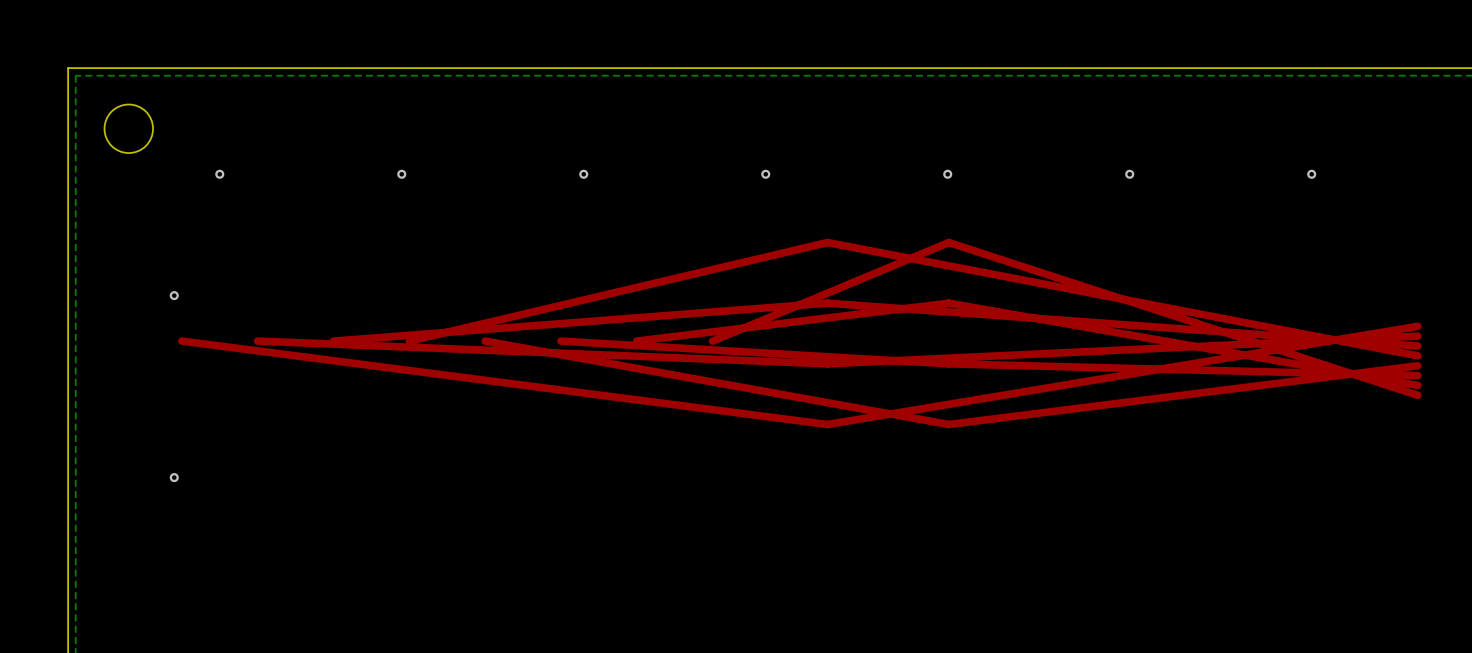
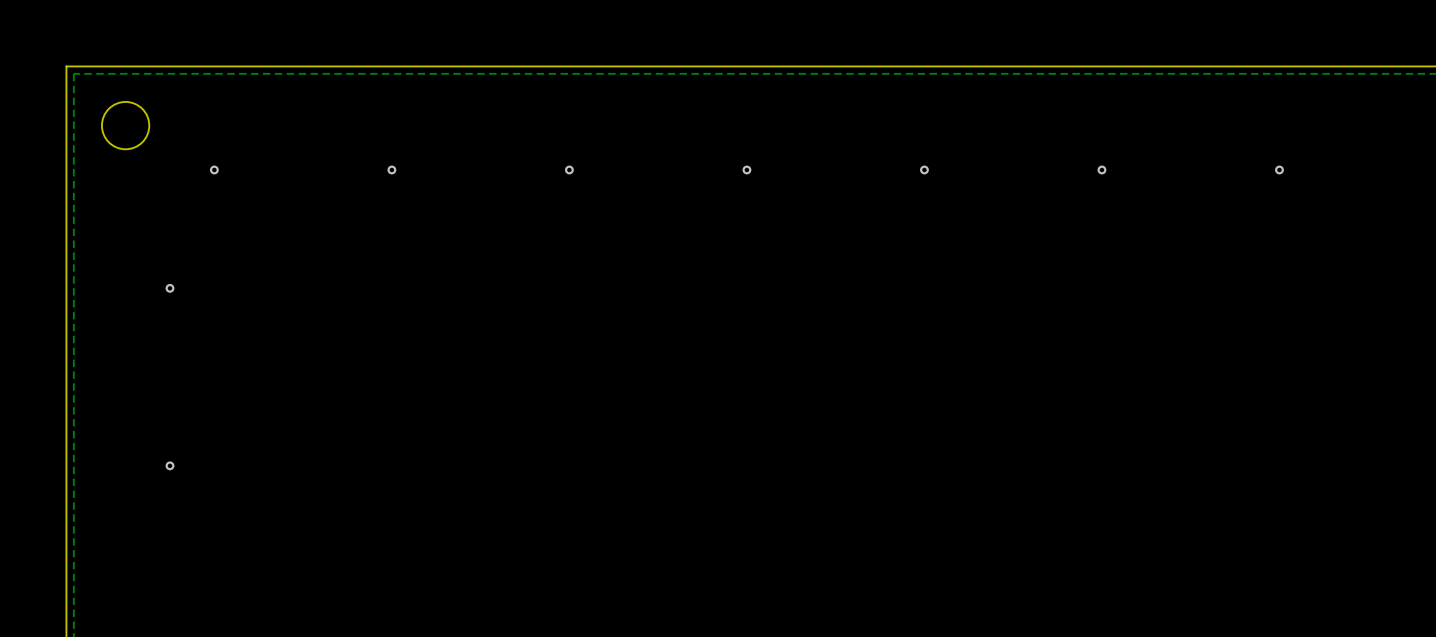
top track: (1417, 326) (827, 424) (181, 341) -> none
top track: (1417, 336) (827, 363) (257, 341) -> none
top track: (333, 341) (827, 303) (1417, 346) -> none
top track: (409, 341) (827, 242) (1417, 355) -> none
top track: (485, 341) (948, 424) (1417, 365) -> none
top track: (561, 341) (948, 363) (1417, 375) -> none
top track: (636, 341) (948, 303) (1417, 385) -> none
top track: (712, 341) (948, 242) (1417, 395) -> none

